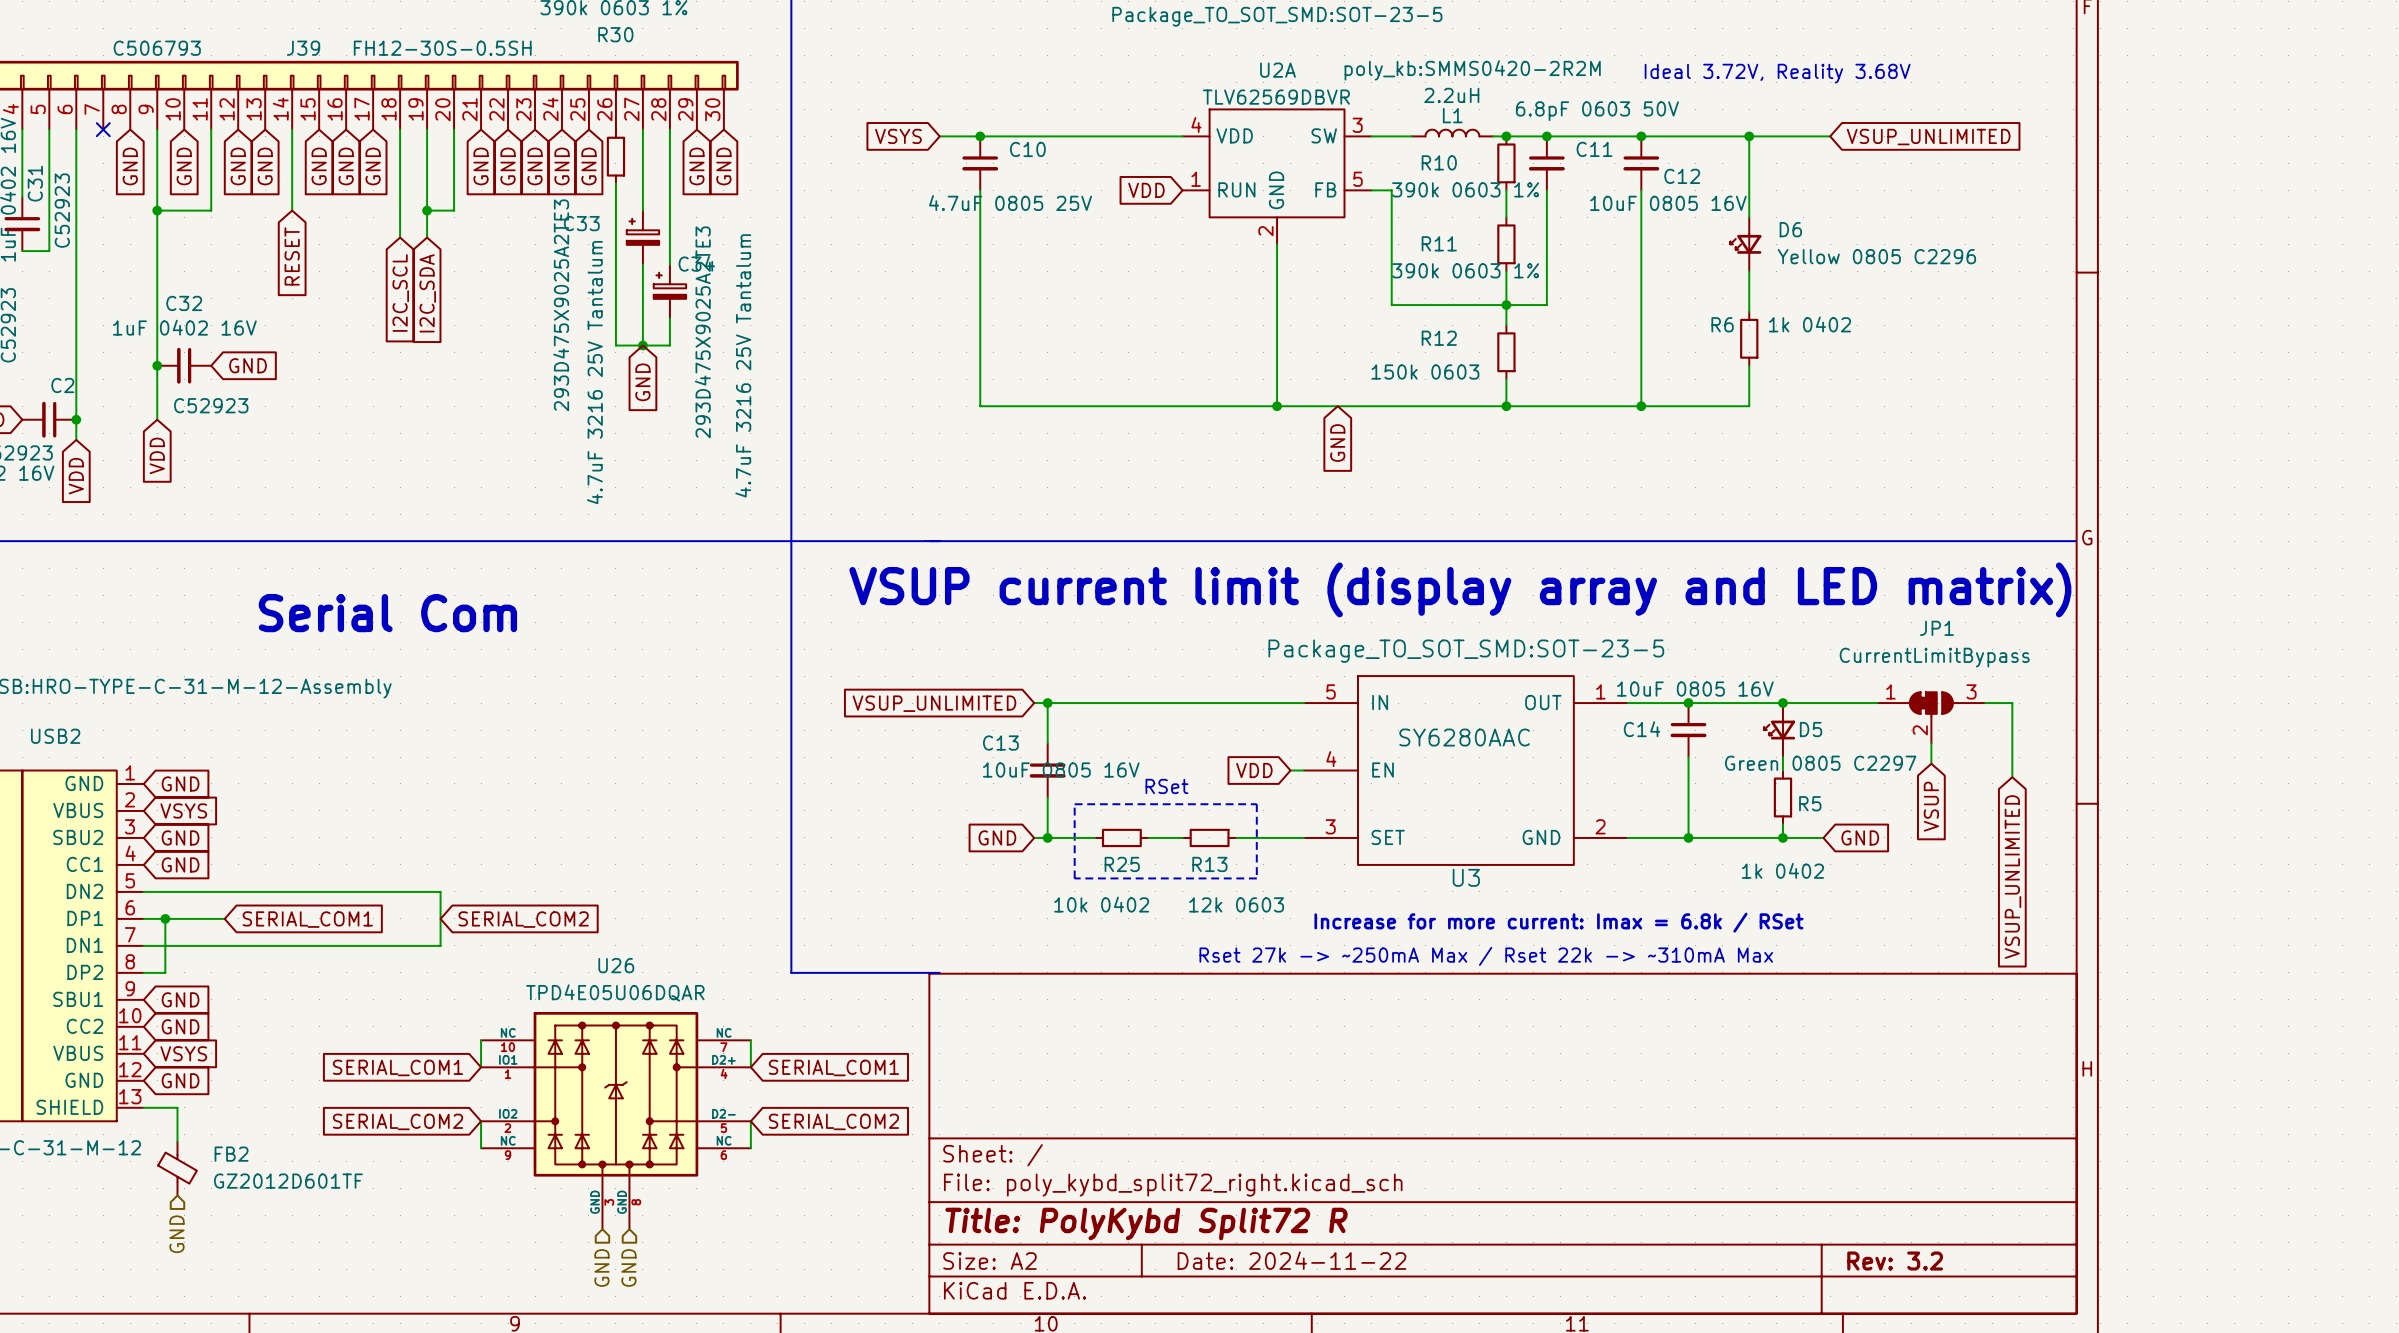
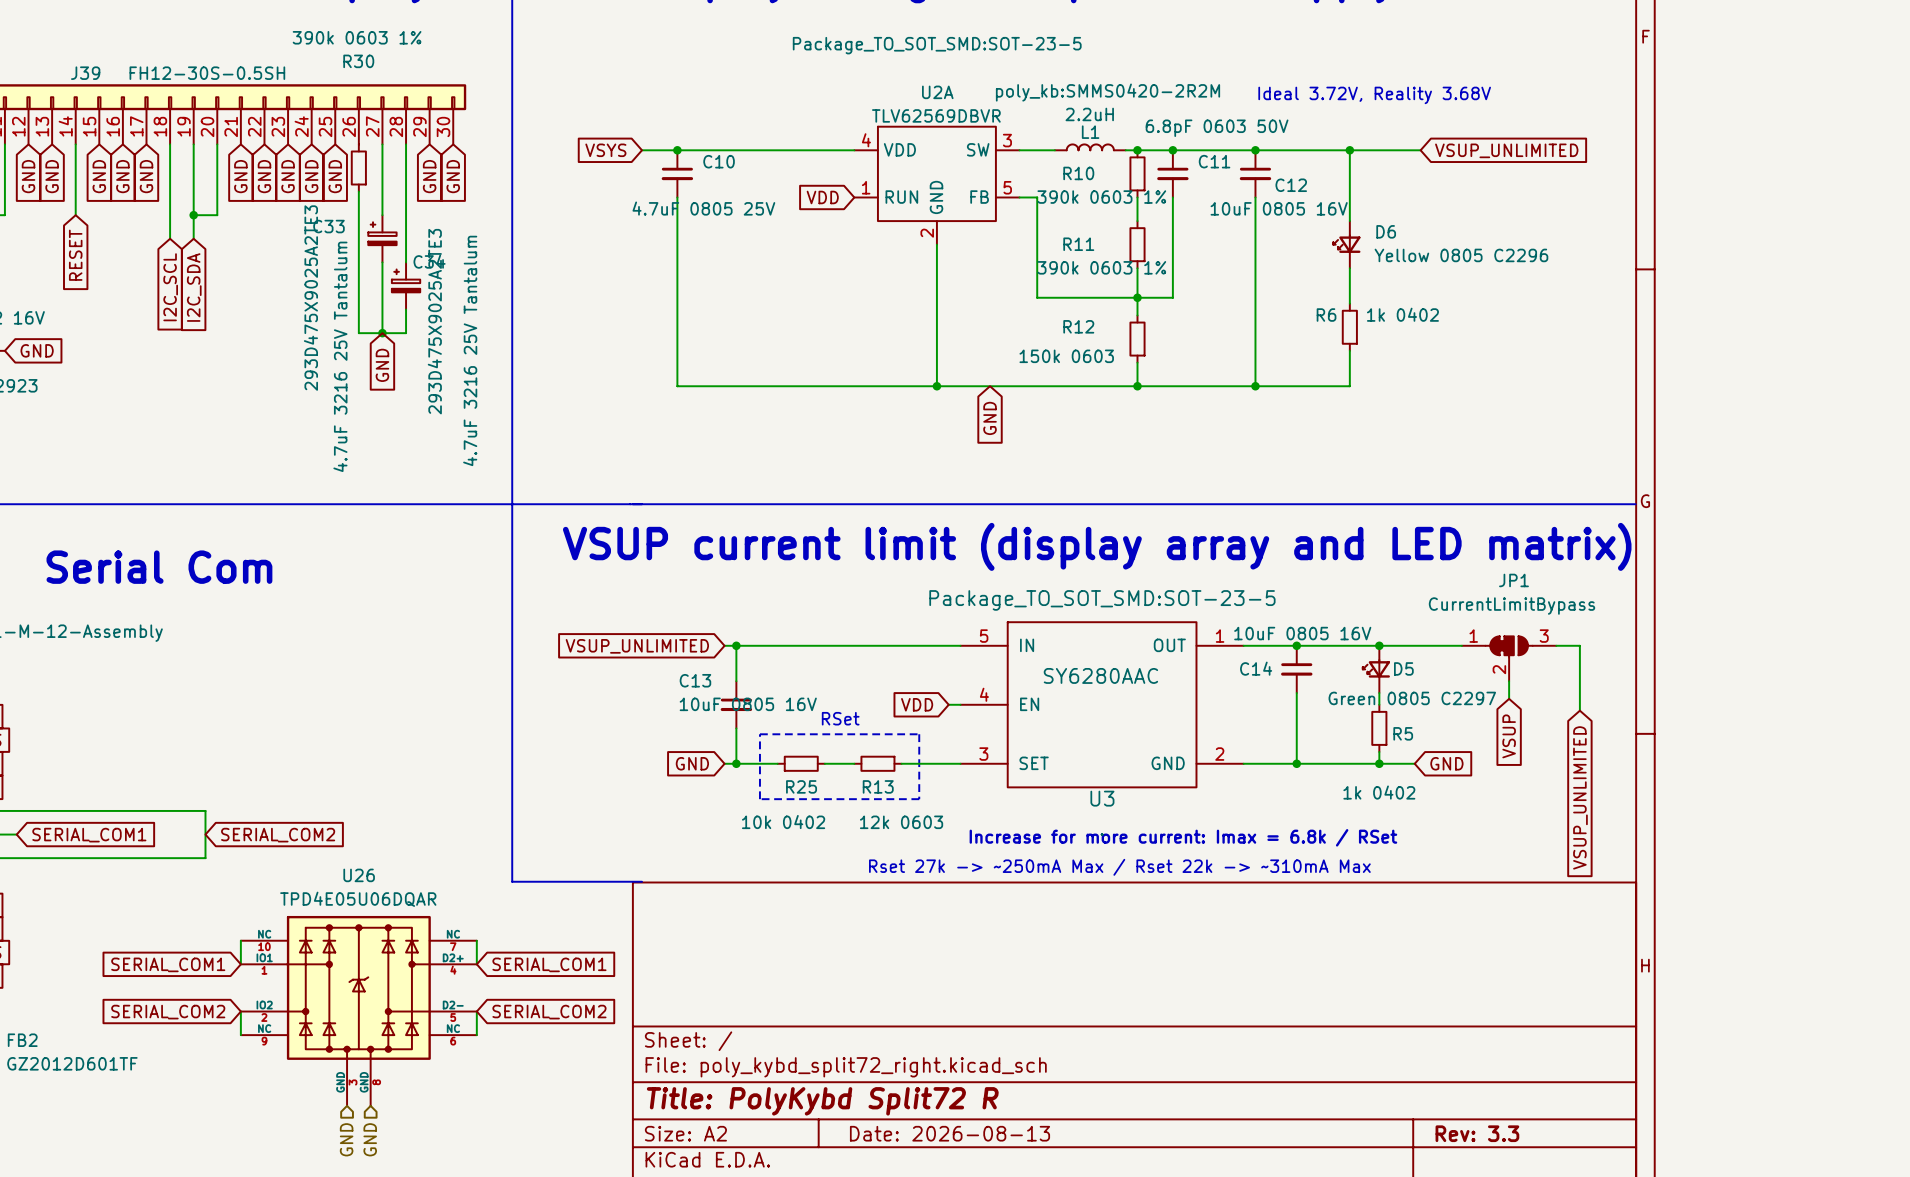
title block: Date: 2024-11-22 (1291, 1260) -> Date: 2026-08-13 (949, 1133)
title block: Rev: 3.2 (1895, 1261) -> Rev: 3.3 (1477, 1133)

